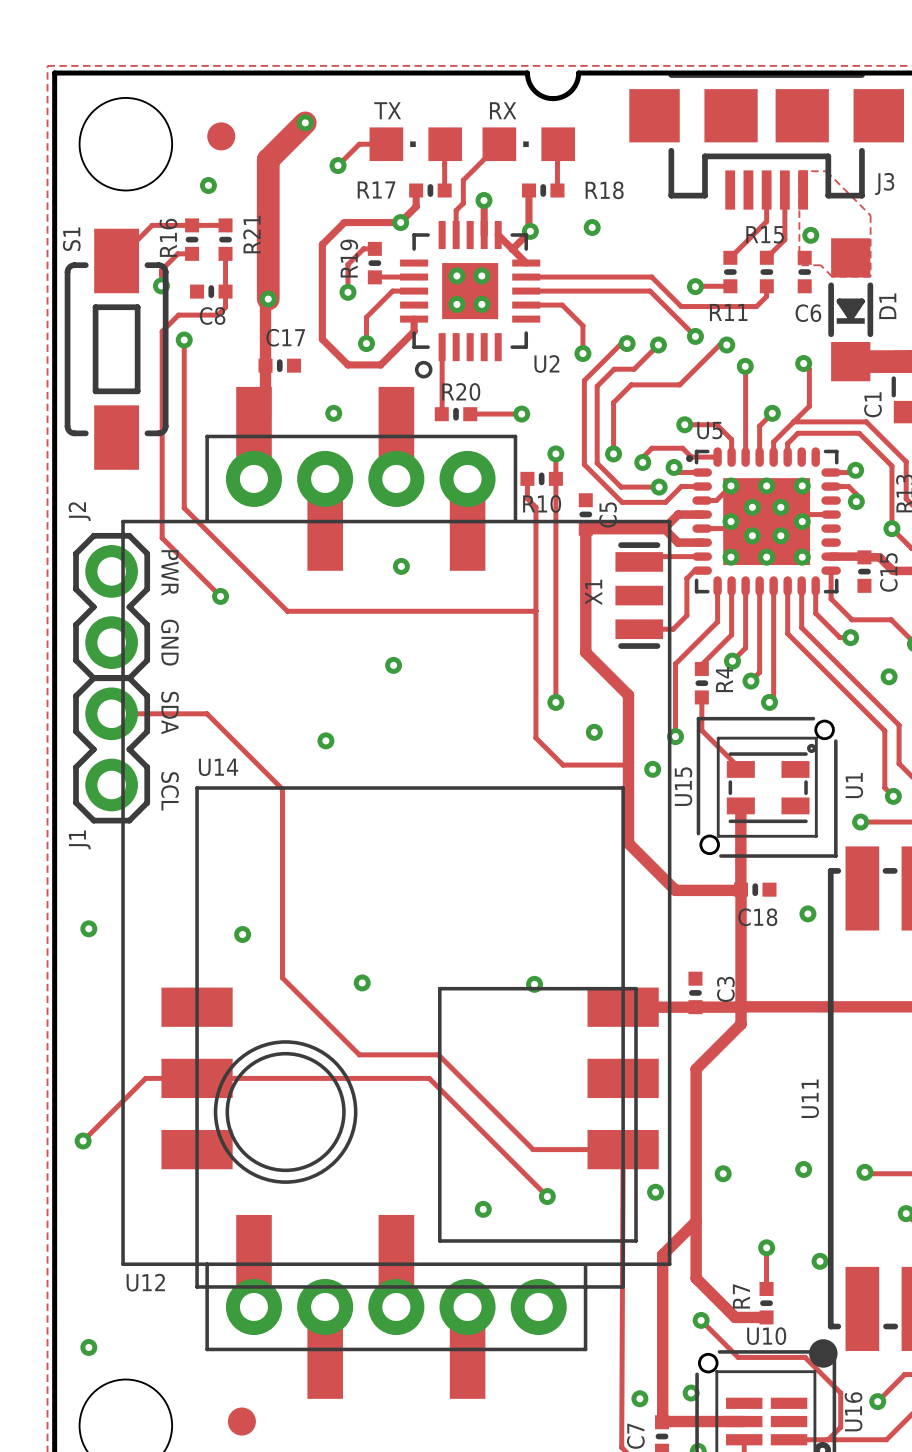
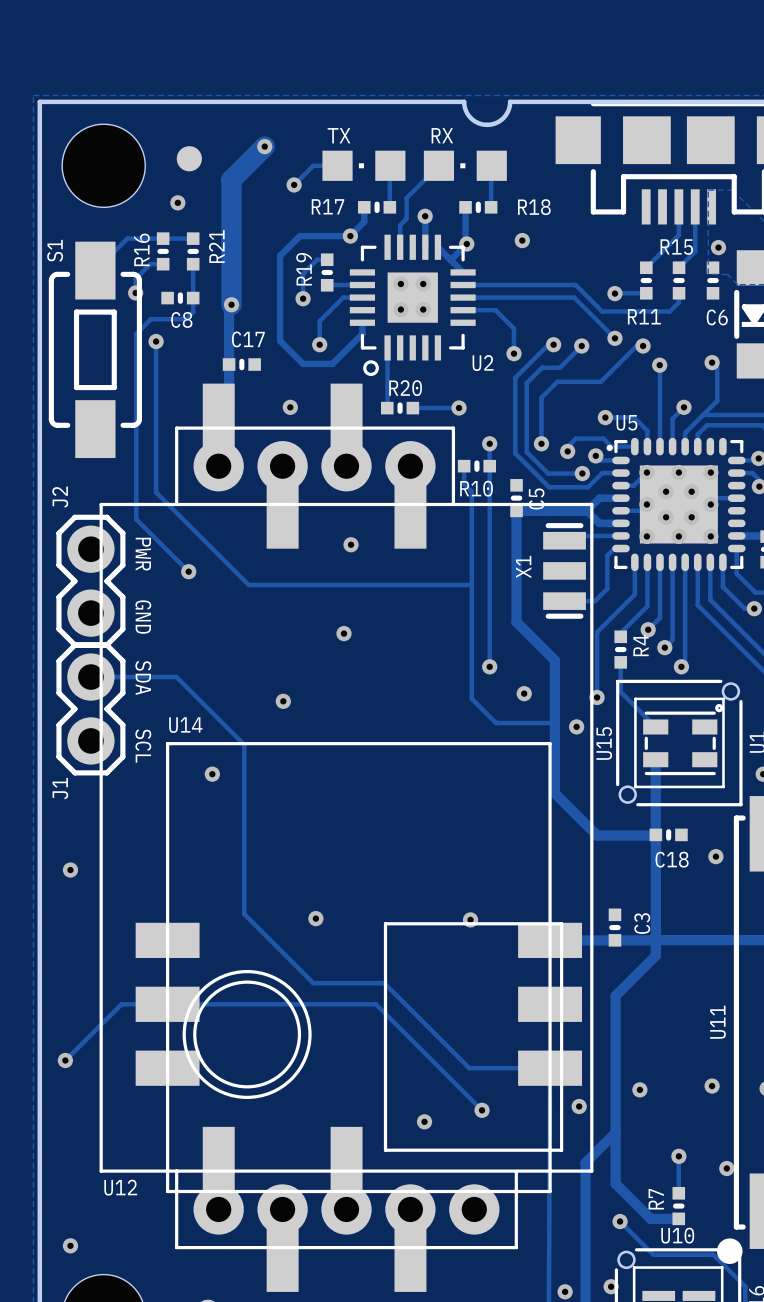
via position: (242, 934) -> (212, 774)

